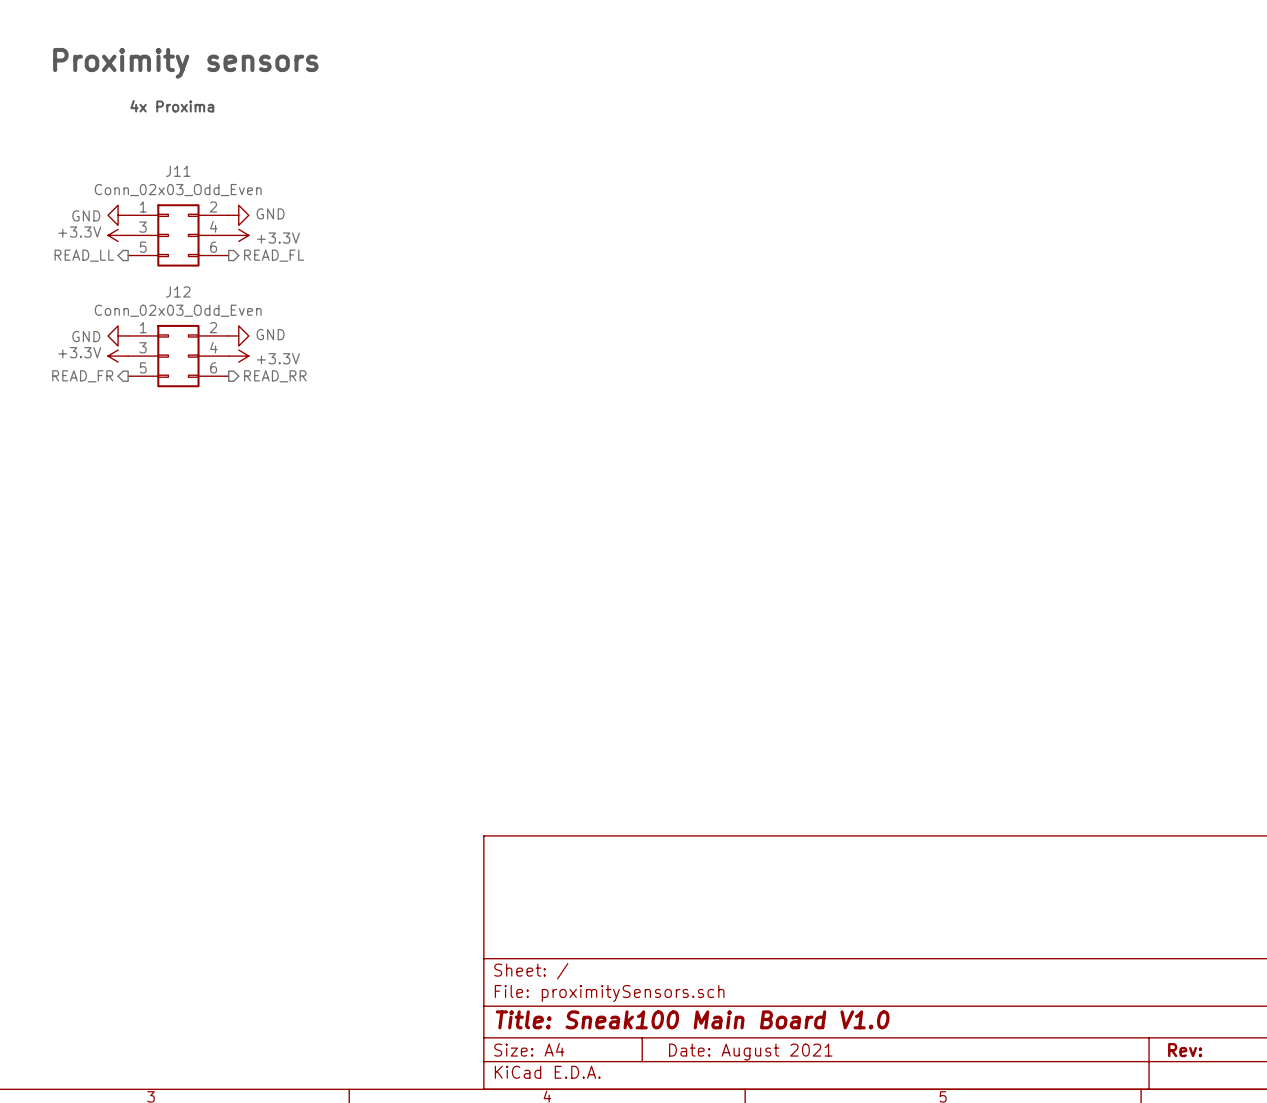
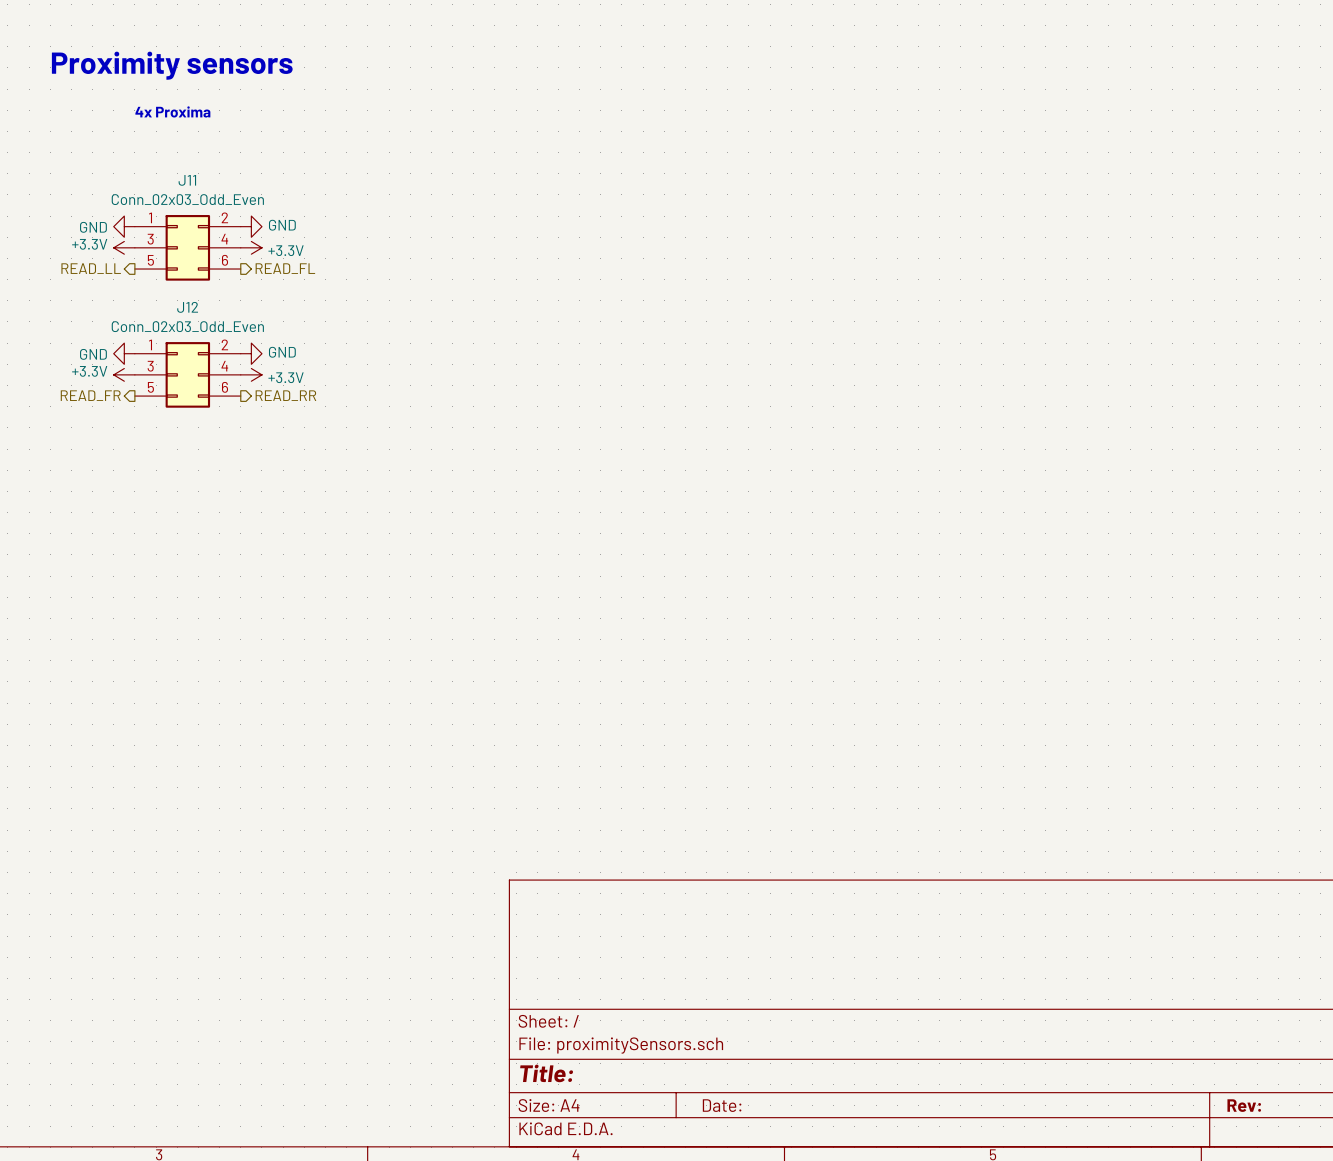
title block: Title: Sneak100 Main Board V1.0 (692, 1019) -> Title: (546, 1073)
title block: Date: August 2021 (750, 1052) -> Date: (722, 1105)

